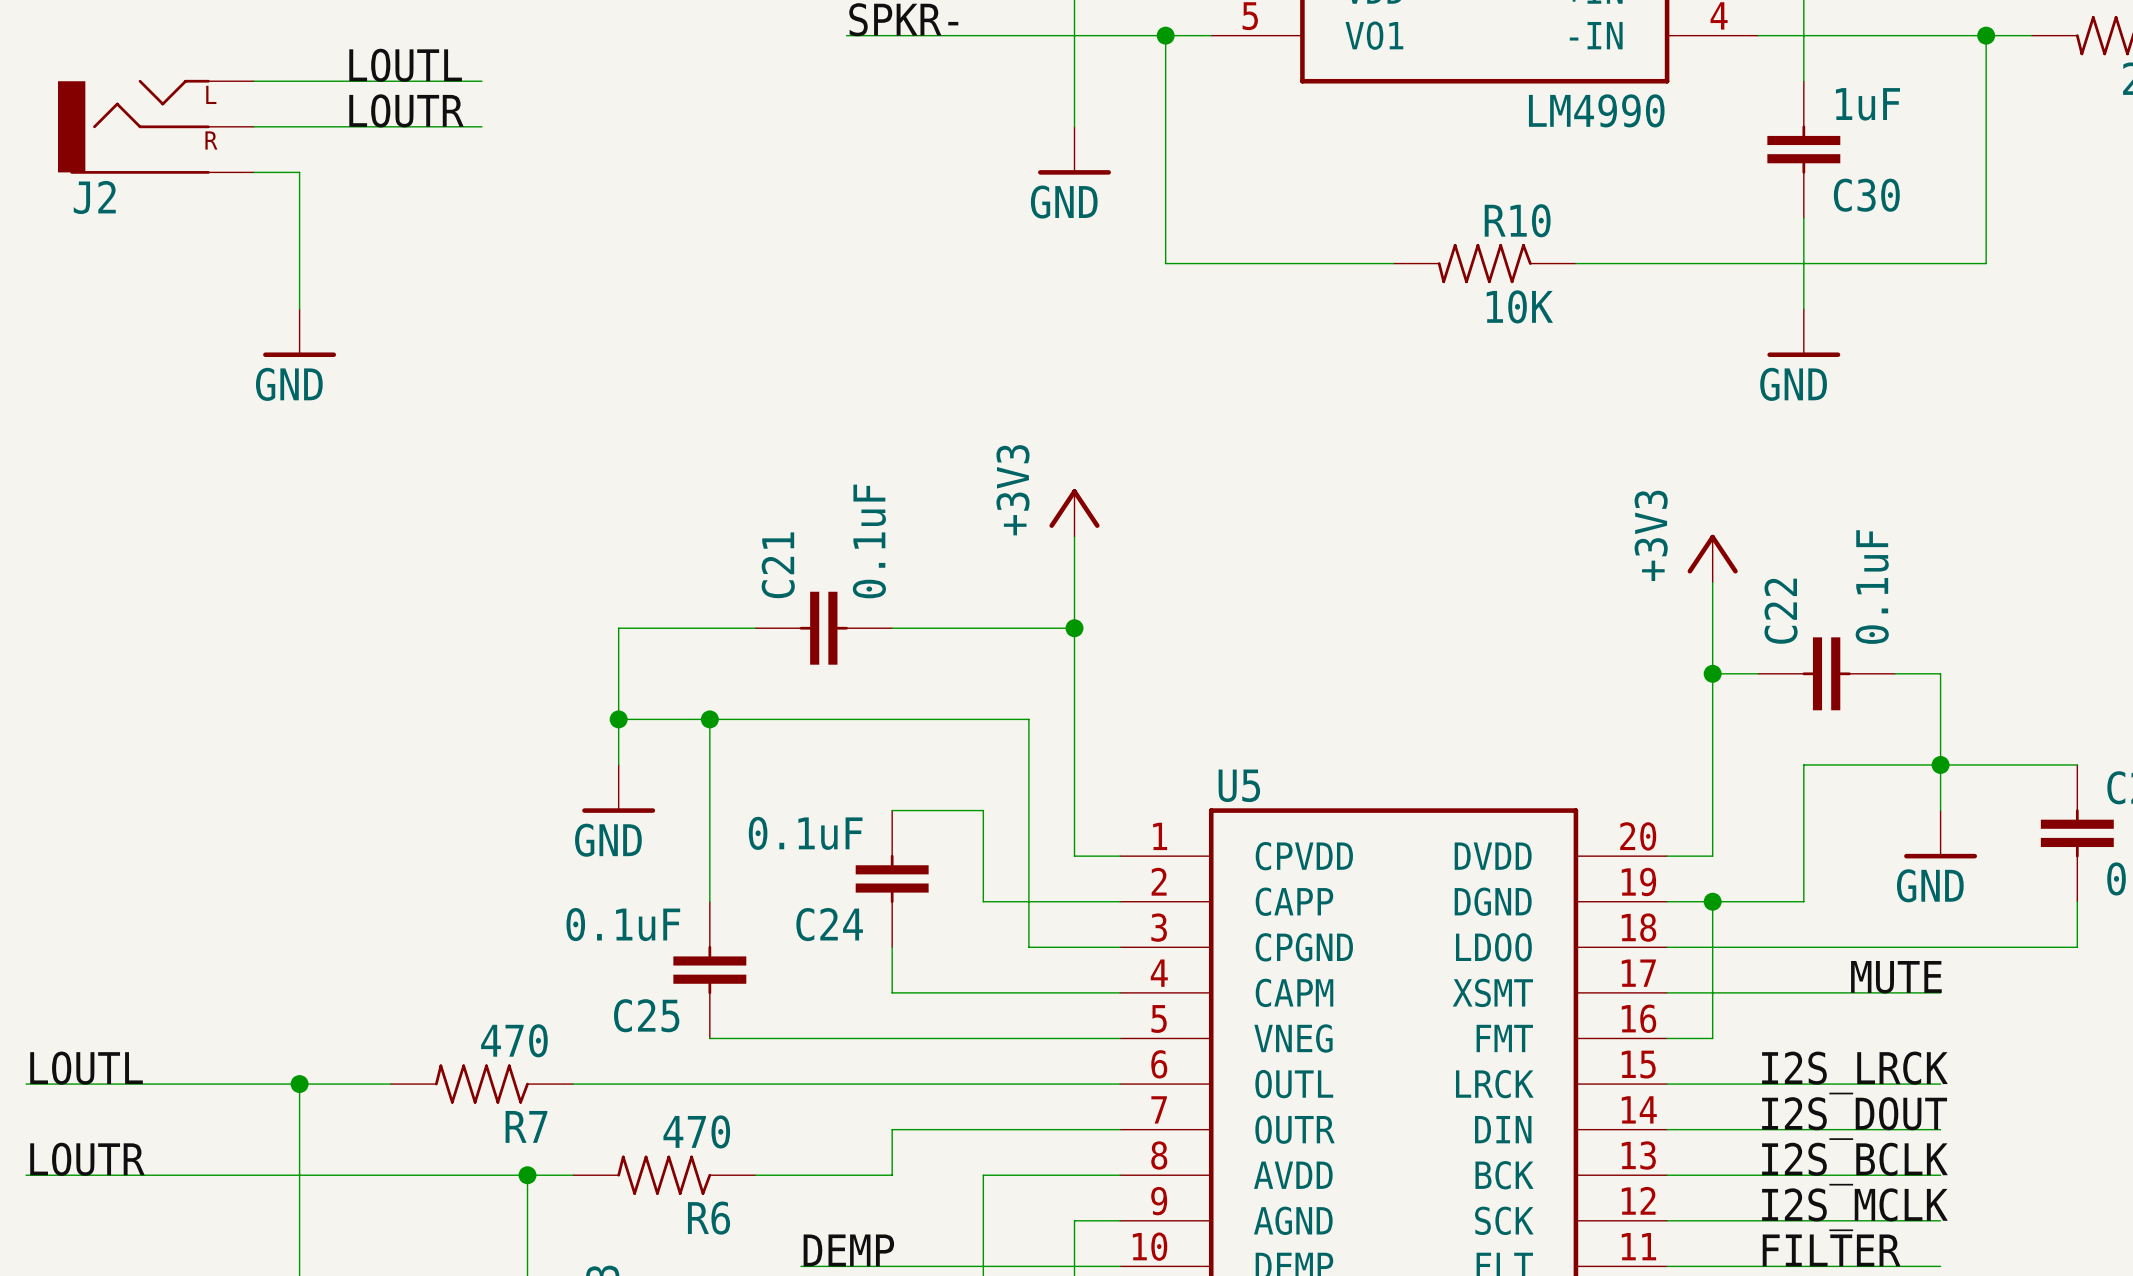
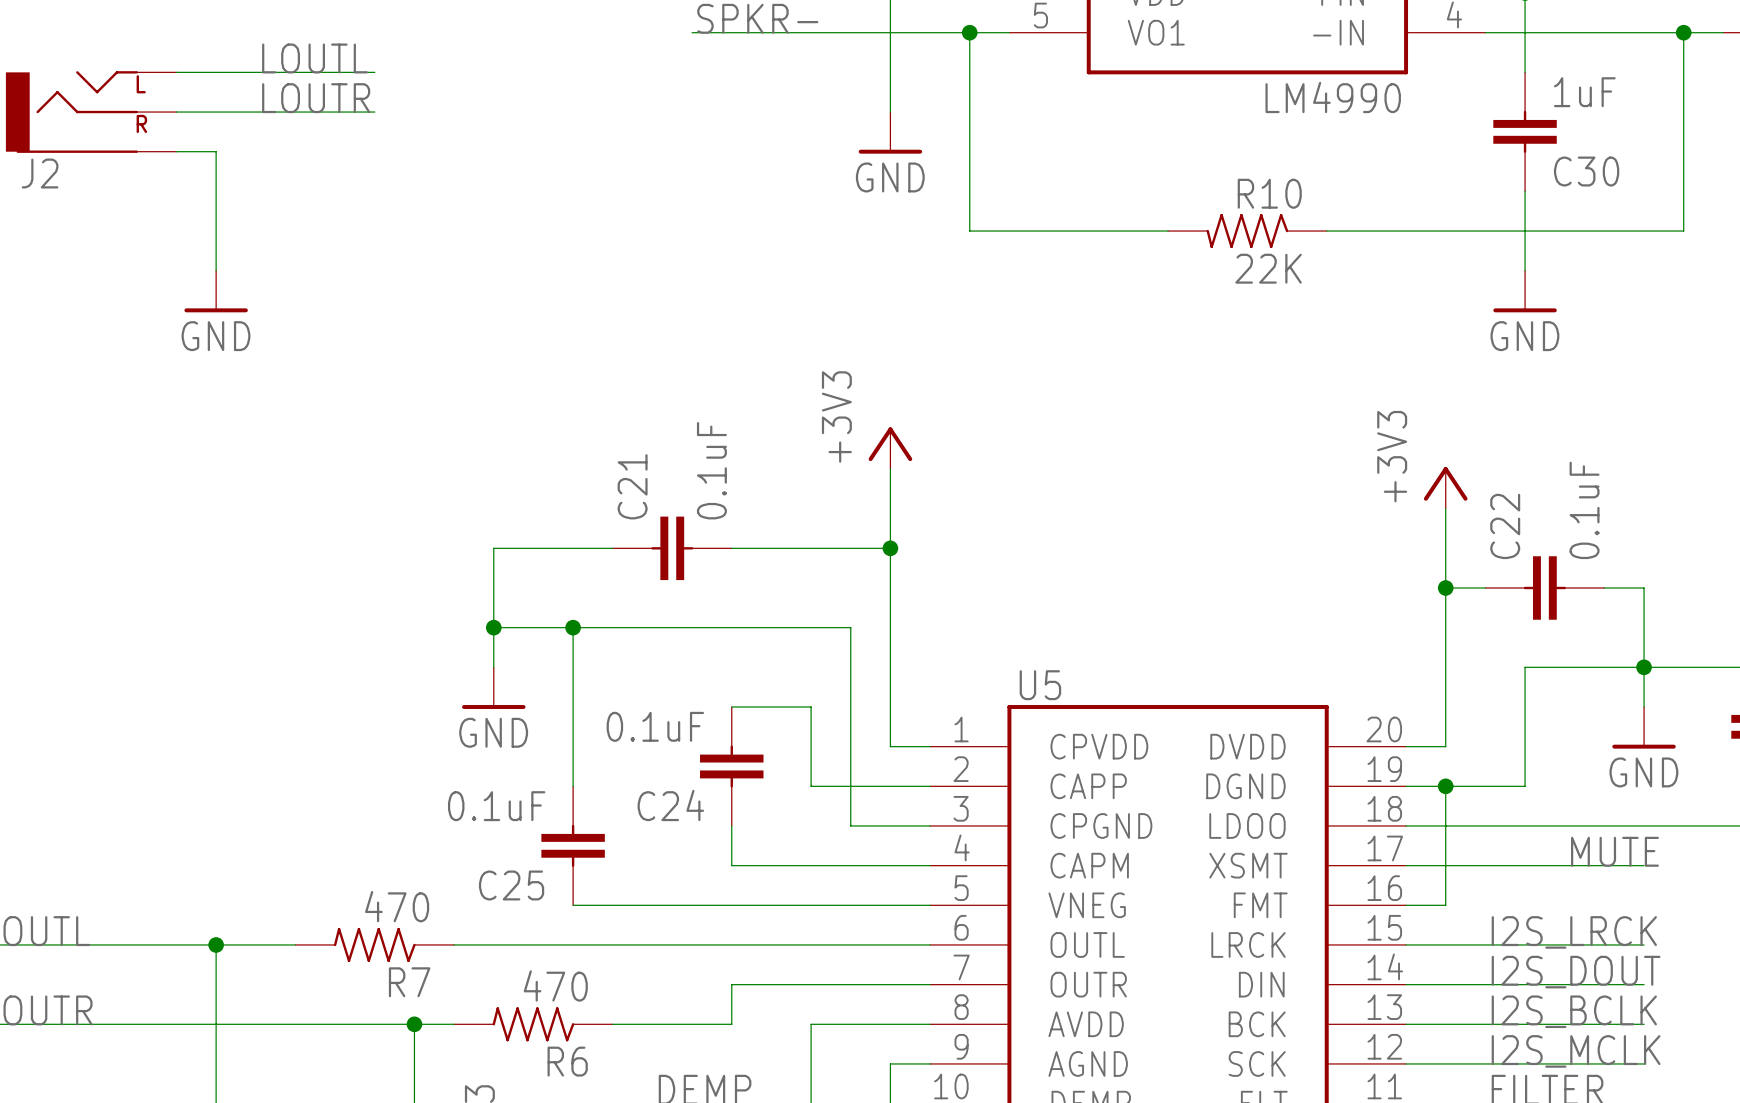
R10 value: 10K (1519, 306) -> 22K (1268, 268)

